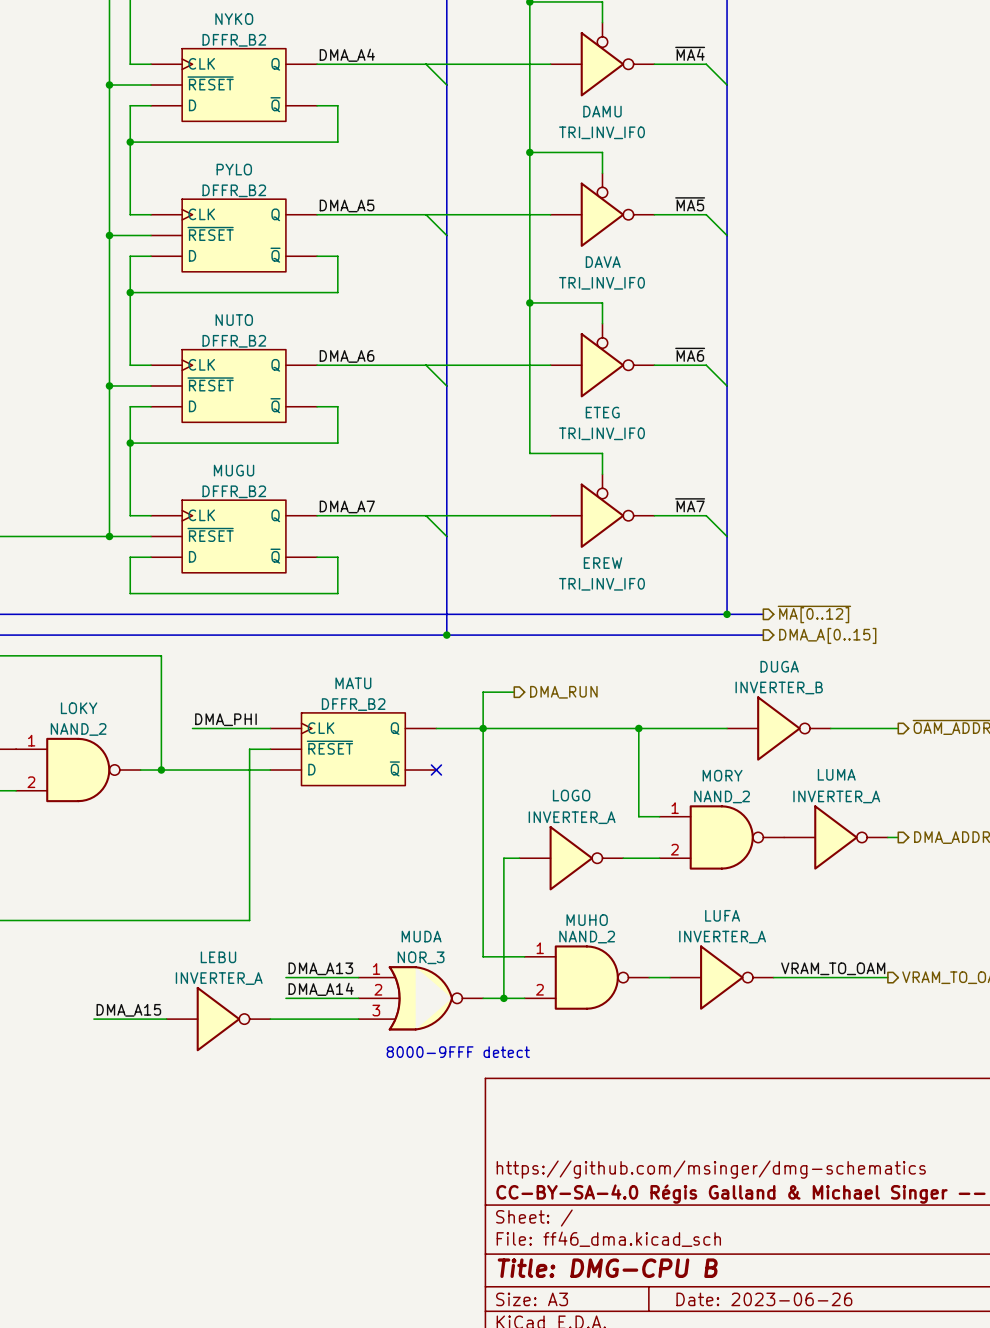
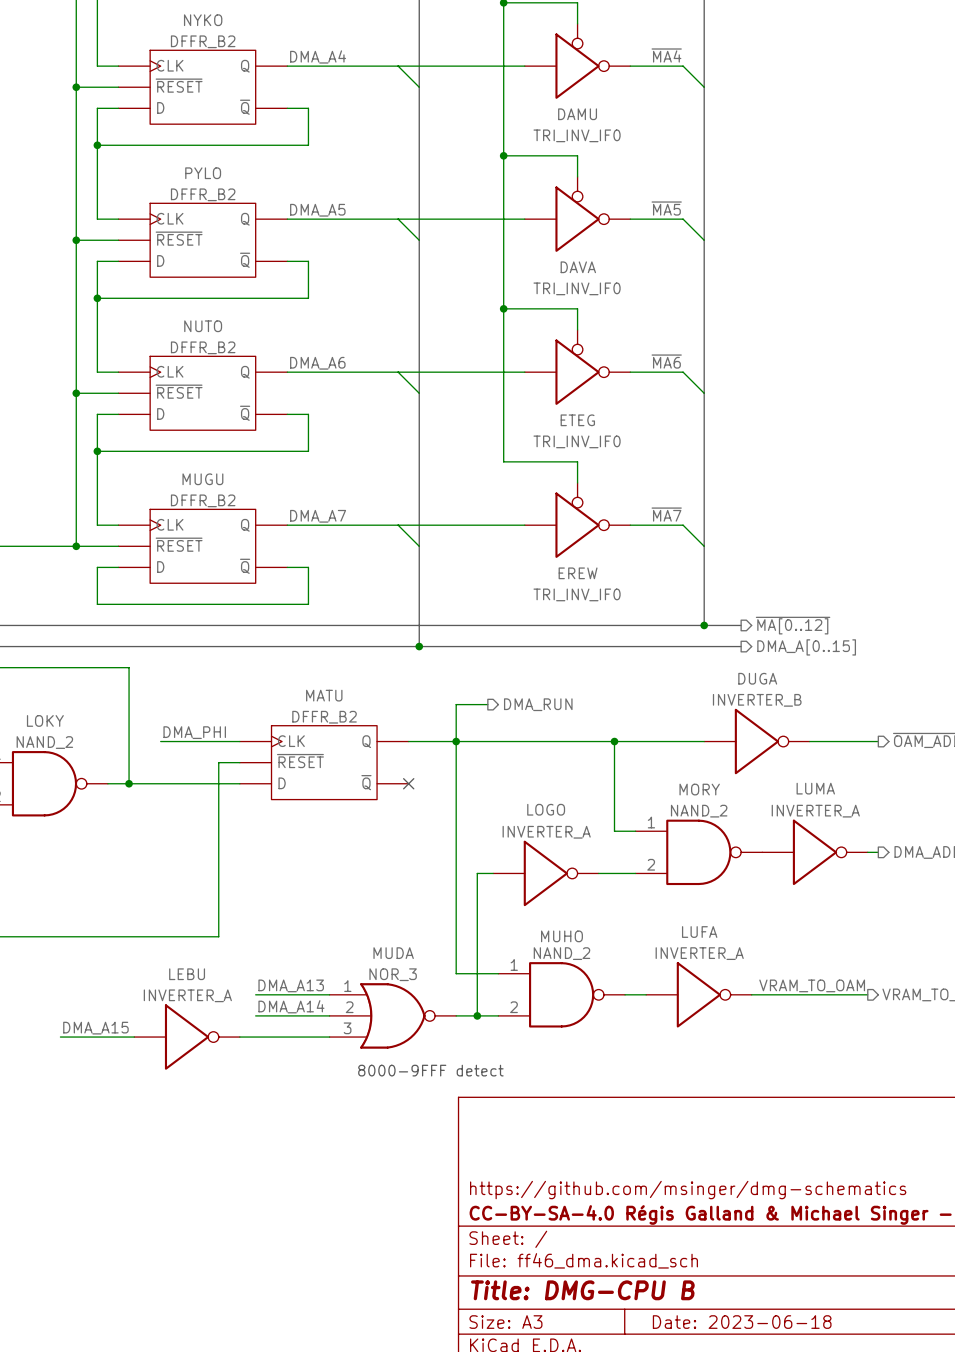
title block: Date: 2023-06-26 (764, 1299) -> Date: 2023-06-18 (742, 1322)

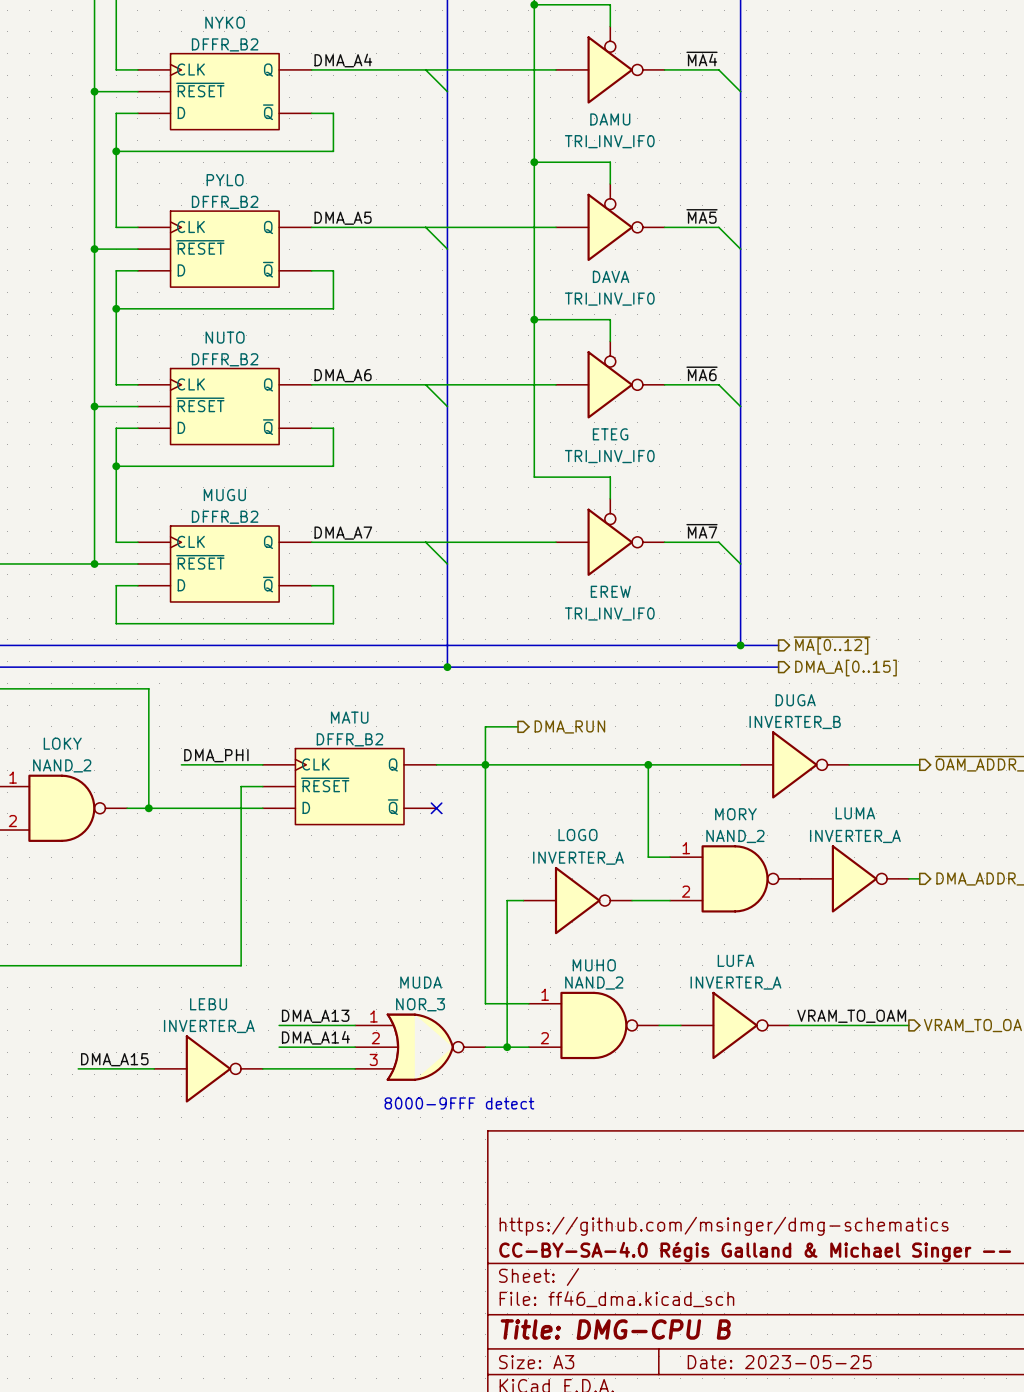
title block: Date: 2023-06-18 (742, 1322) -> Date: 2023-05-25 (779, 1362)

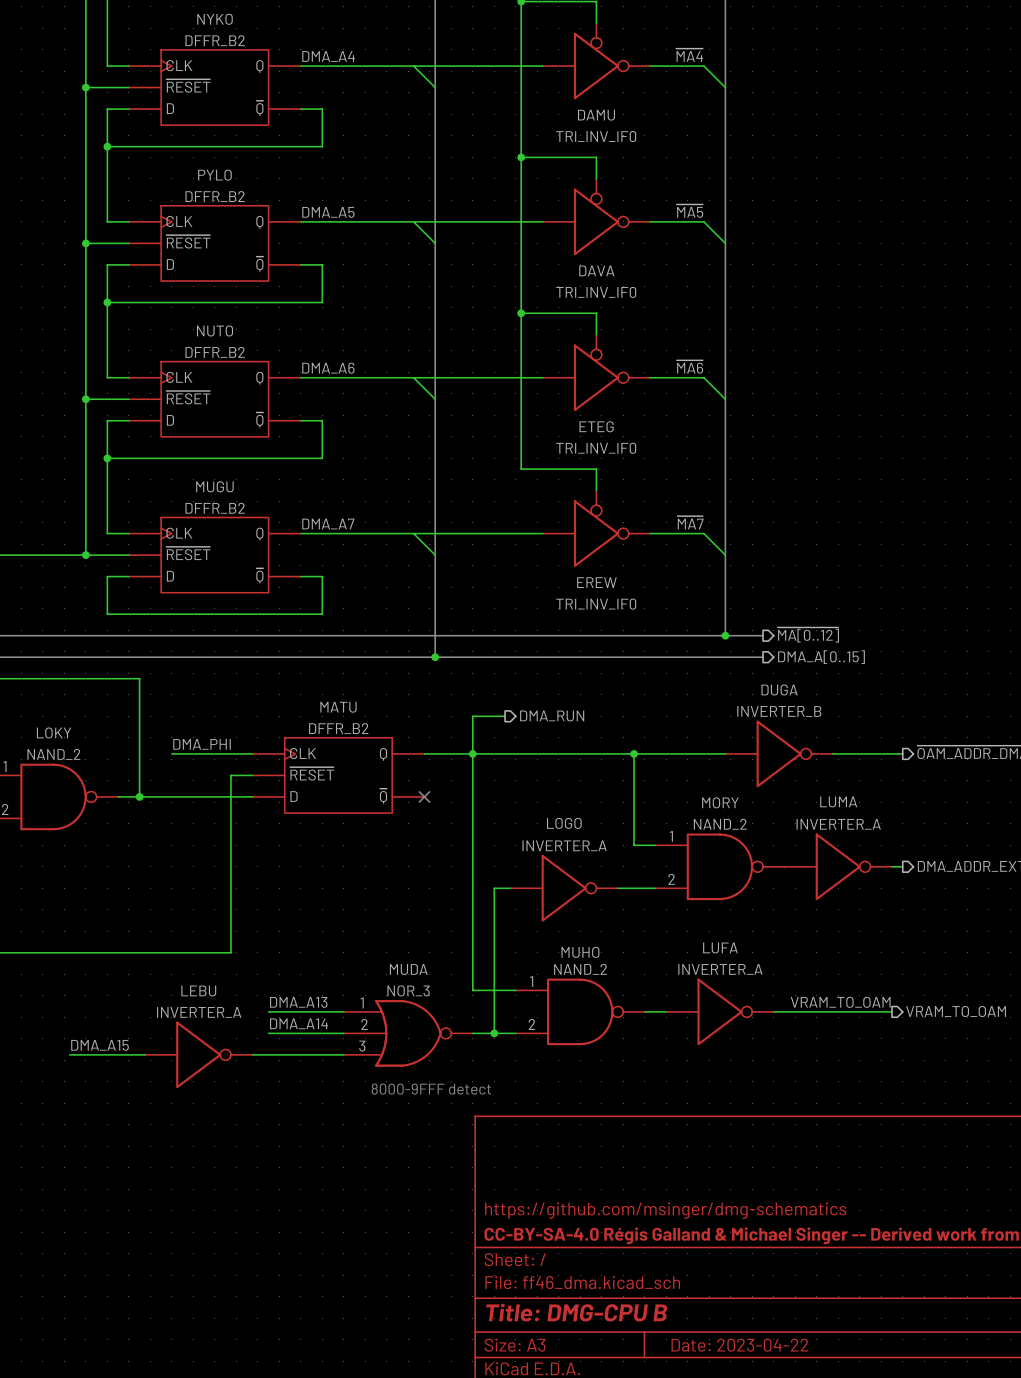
title block: Date: 2023-05-25 (779, 1362) -> Date: 2023-04-22 (739, 1345)

